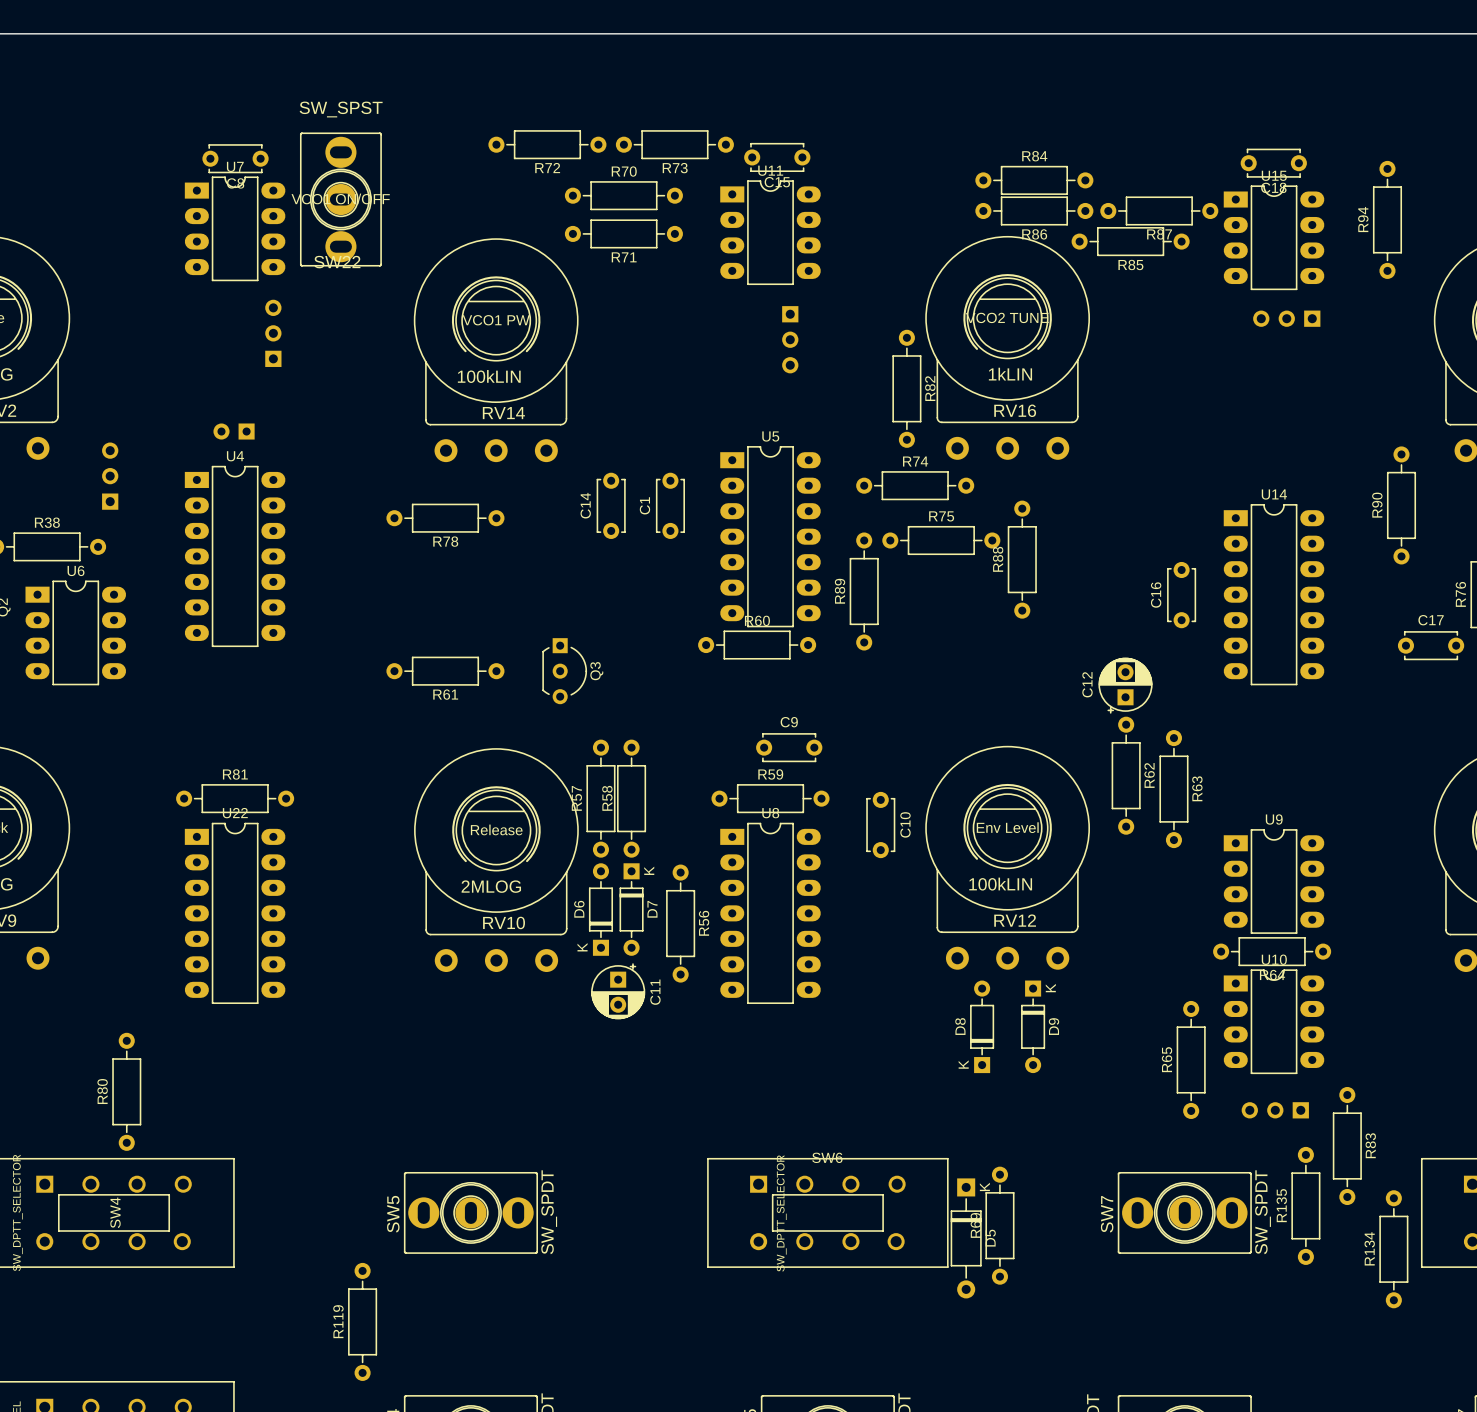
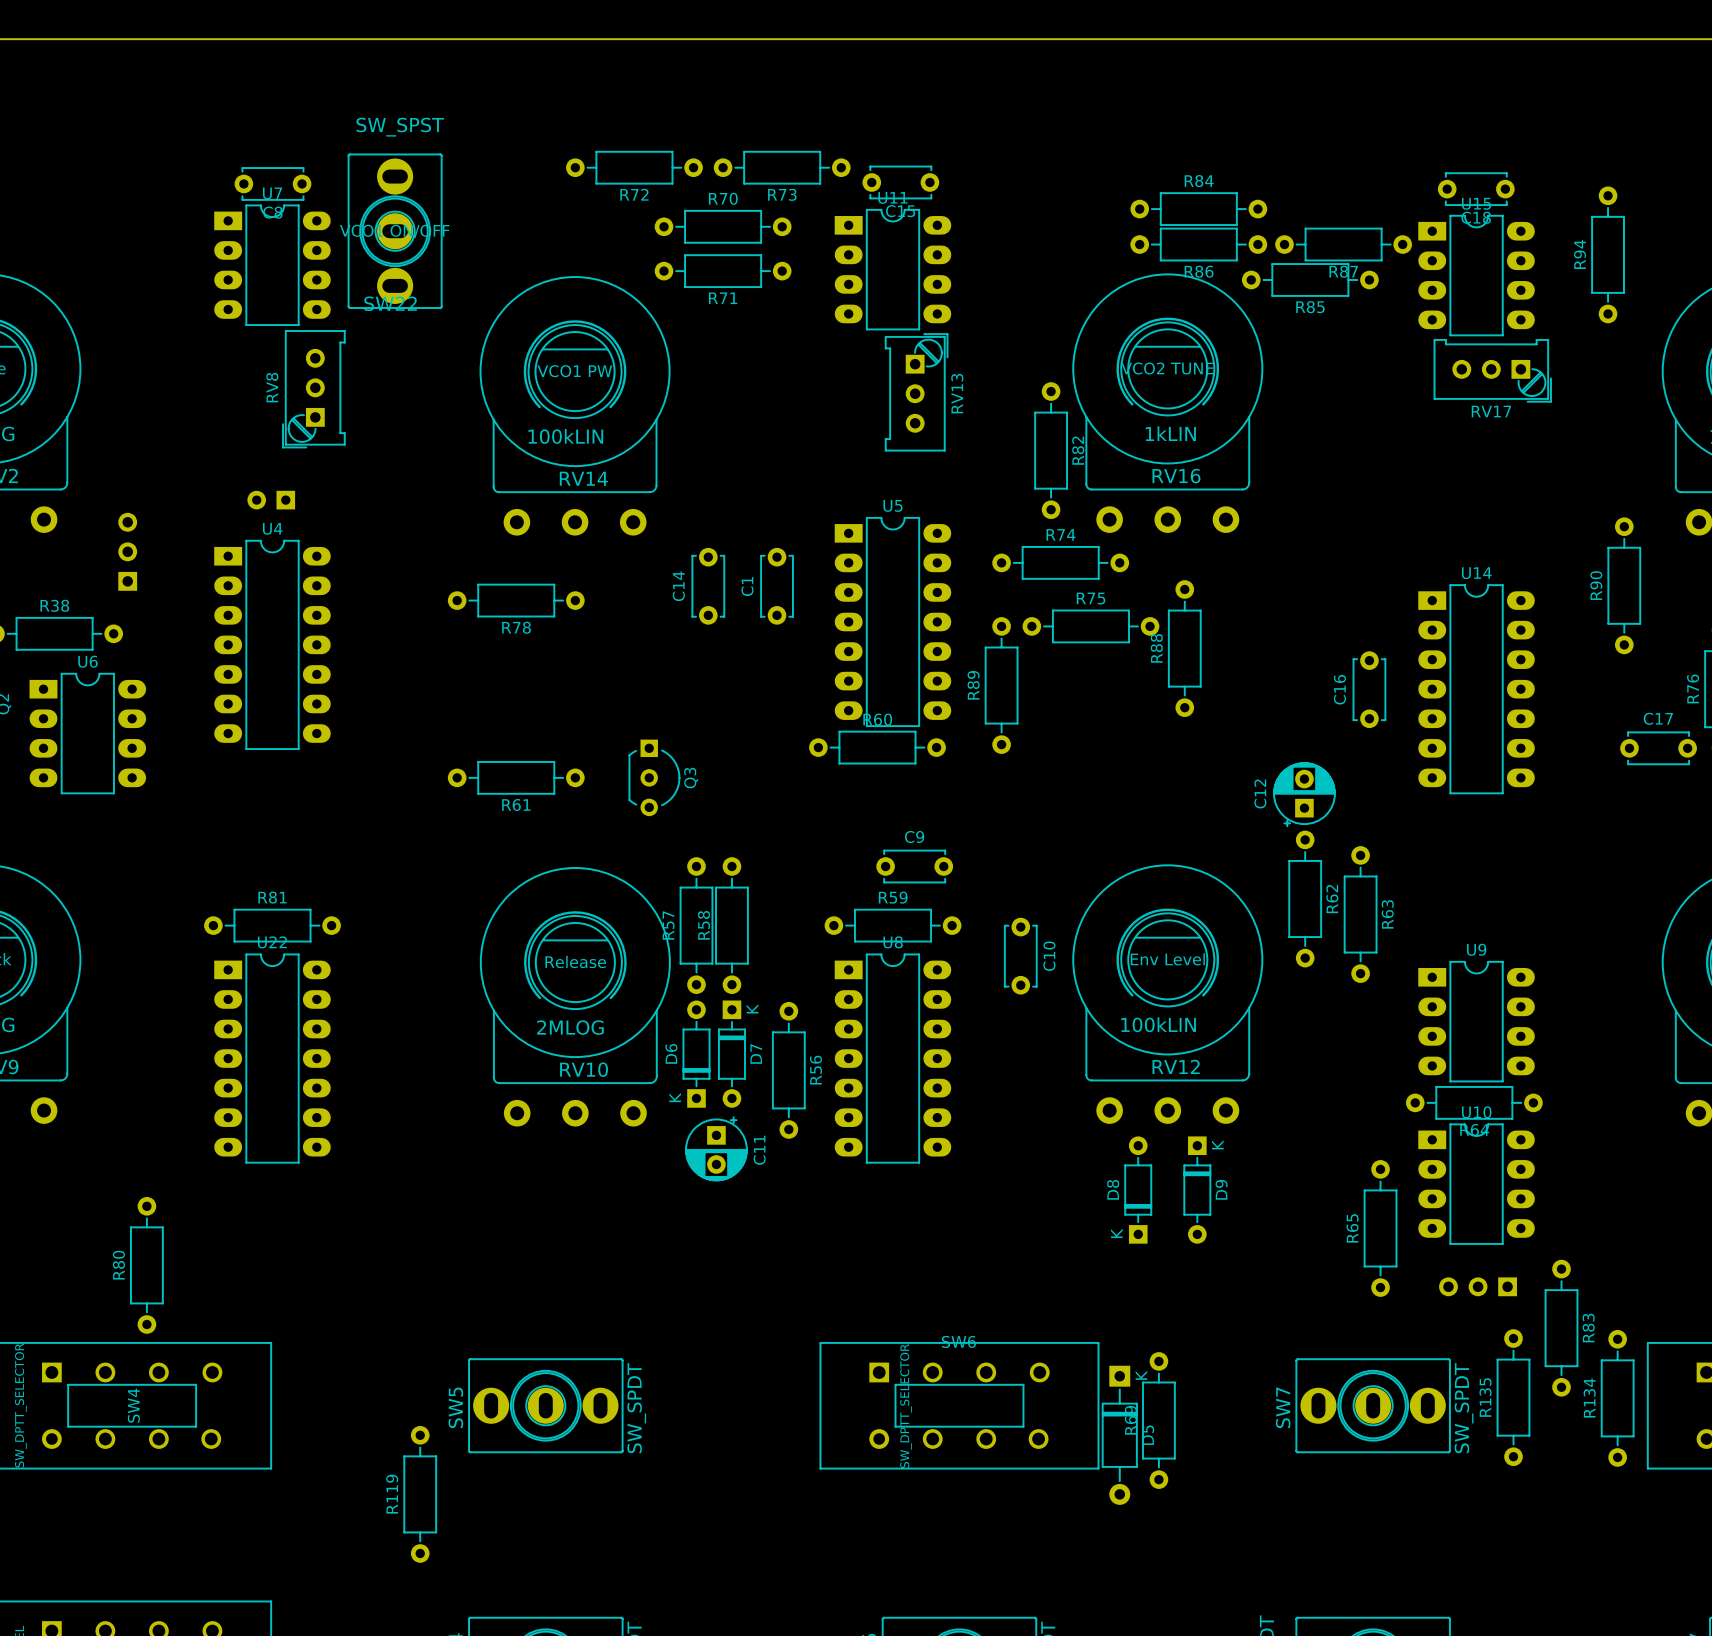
RV17 side: bottom (1286, 318) -> top (1492, 370)
RV8 side: bottom (273, 333) -> top (313, 389)
RV13 side: bottom (790, 339) -> top (916, 392)
R134 position: (1393, 1249) -> (1617, 1398)
R119 position: (362, 1321) -> (420, 1494)

